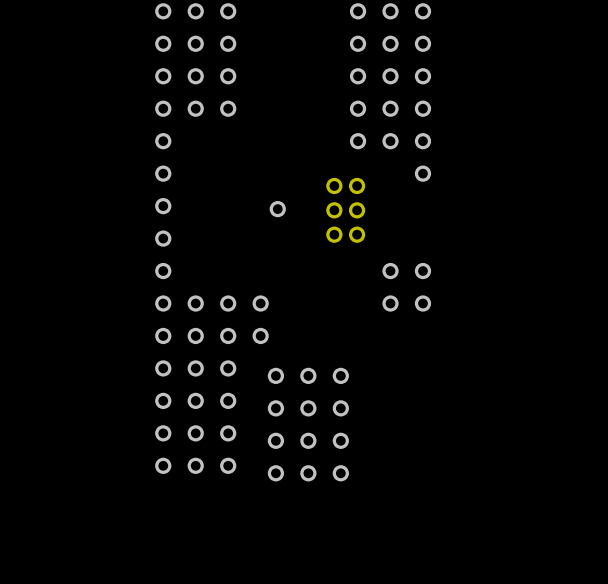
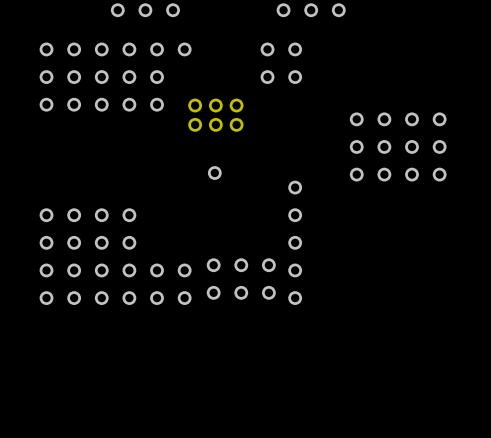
via position: (163, 108) -> (129, 49)
via position: (195, 108) -> (157, 49)
via position: (228, 108) -> (184, 49)
via position: (358, 108) -> (295, 49)
via: (390, 108) -> none
via: (422, 108) -> none
via: none -> (46, 49)
via: none -> (74, 49)
via: none -> (101, 49)
via: none -> (267, 49)
via position: (163, 141) -> (129, 77)
via position: (358, 141) -> (295, 77)
via: (390, 141) -> none
via: (422, 141) -> none
via: none -> (46, 77)
via: none -> (74, 77)
via: none -> (101, 77)
via: none -> (157, 77)
via: none -> (267, 77)
via position: (163, 173) -> (129, 104)
via: (422, 173) -> none
via: none -> (46, 104)
via: none -> (74, 104)
via: none -> (101, 104)
via: none -> (157, 104)
via: none -> (356, 119)
via: none -> (384, 119)
via: none -> (412, 119)
via: none -> (439, 119)
via: (163, 206) -> none
via: (277, 209) -> none
part rotation: 0° (345, 210) -> 90° clockwise (215, 115)
part position: (345, 210) -> (215, 115)
via: none -> (356, 146)
via: none -> (384, 146)
via: none -> (412, 146)
via: none -> (439, 146)
via: (163, 238) -> none
via: none -> (214, 173)
via: none -> (356, 174)
via: none -> (384, 174)
via: none -> (412, 174)
via: none -> (439, 174)
via: (163, 271) -> none
via: (390, 271) -> none
via: (422, 271) -> none
via: none -> (295, 187)
via position: (163, 303) -> (129, 215)
via: (195, 303) -> none
via: (228, 303) -> none
via: (260, 303) -> none
via: (390, 303) -> none
via: (422, 303) -> none
via: none -> (46, 215)
via: none -> (74, 215)
via: none -> (101, 215)
via: none -> (295, 215)
via position: (163, 335) -> (129, 242)
via: (195, 335) -> none
via: (228, 335) -> none
via: (260, 335) -> none
via: none -> (46, 242)
via: none -> (74, 242)
via: none -> (101, 242)
via: none -> (295, 242)
via position: (163, 368) -> (129, 270)
via position: (195, 368) -> (157, 270)
via position: (228, 368) -> (184, 270)
via: none -> (46, 270)
via: none -> (74, 270)
via: none -> (101, 270)
via: none -> (295, 270)
via position: (163, 400) -> (129, 298)
via position: (195, 400) -> (157, 298)
via position: (228, 400) -> (184, 298)
via: none -> (46, 298)
via: none -> (74, 298)
via: none -> (101, 298)
via: none -> (295, 298)
via: (163, 433) -> none
via: (195, 433) -> none
via: (228, 433) -> none
via: (275, 440) -> none
via: (308, 440) -> none
via: (340, 440) -> none
via: (163, 465) -> none
via: (195, 465) -> none
via: (228, 465) -> none
via: (275, 473) -> none
via: (308, 473) -> none
via: (340, 473) -> none

